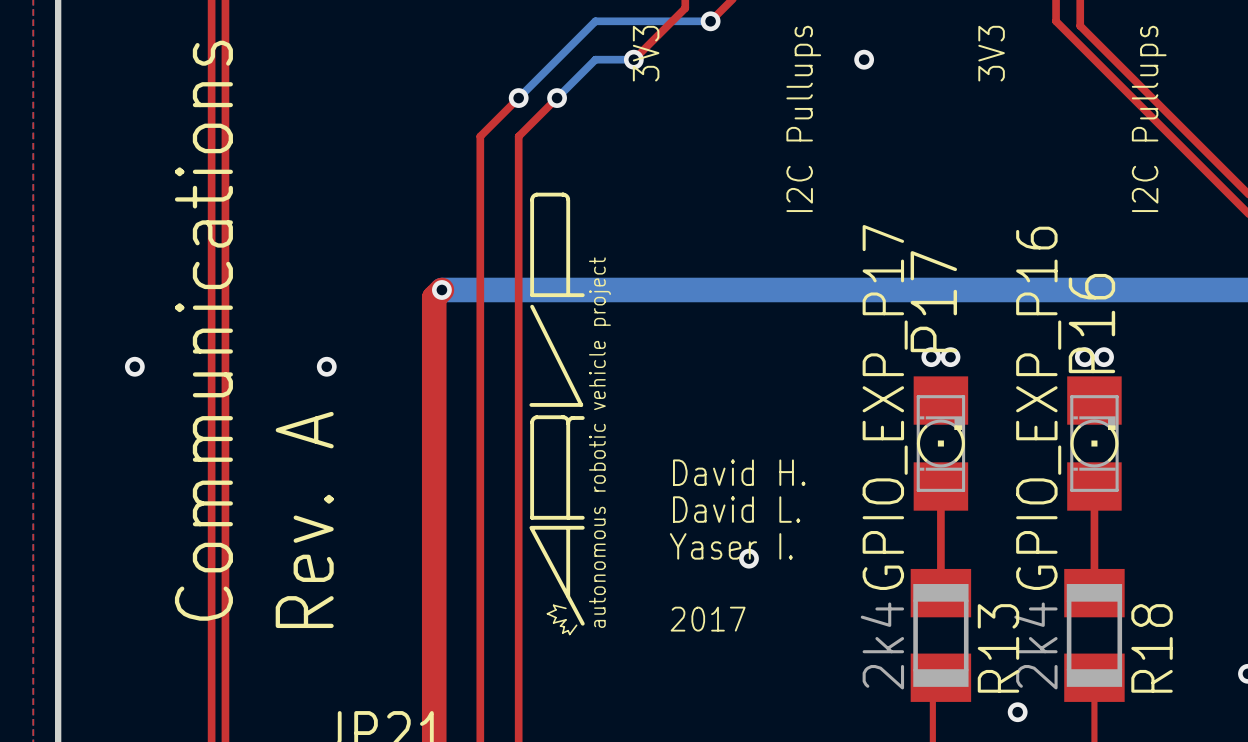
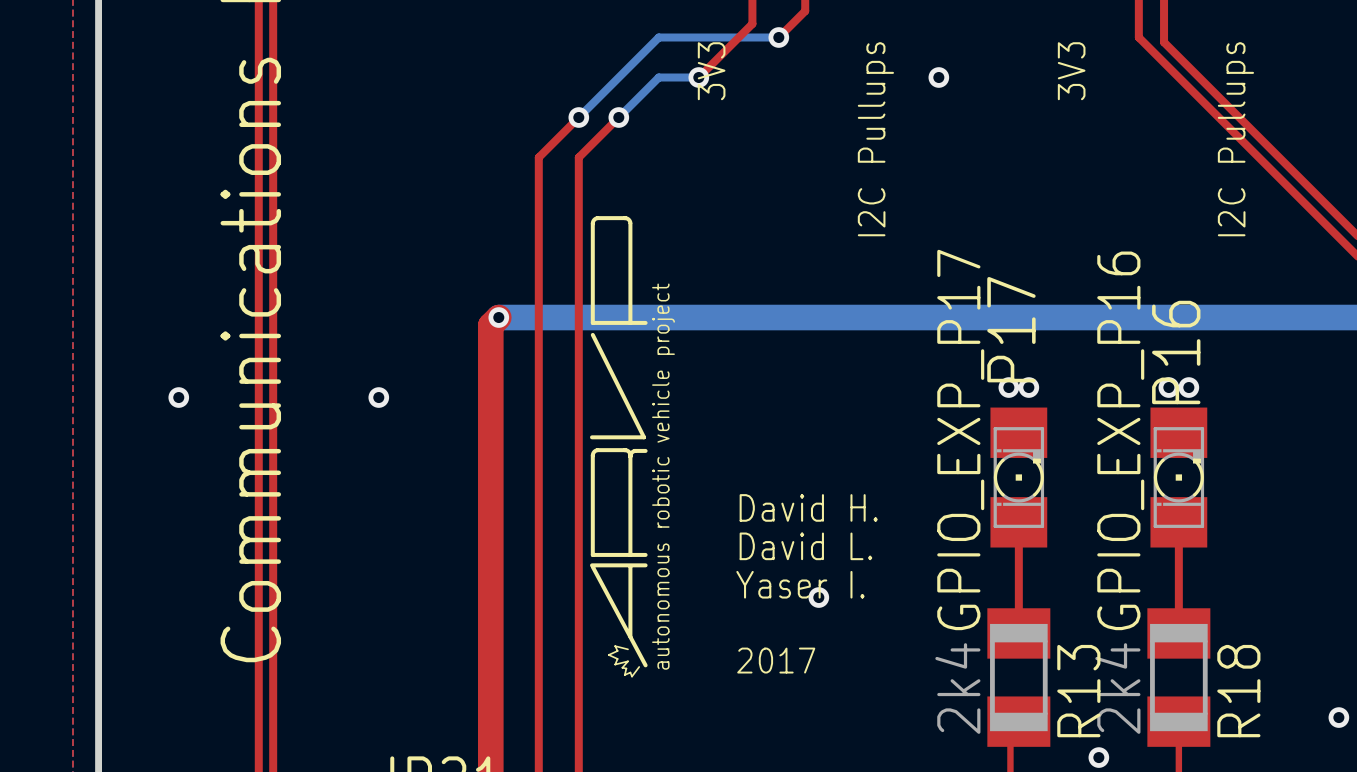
text: Rev. A (304, 519) -> none

